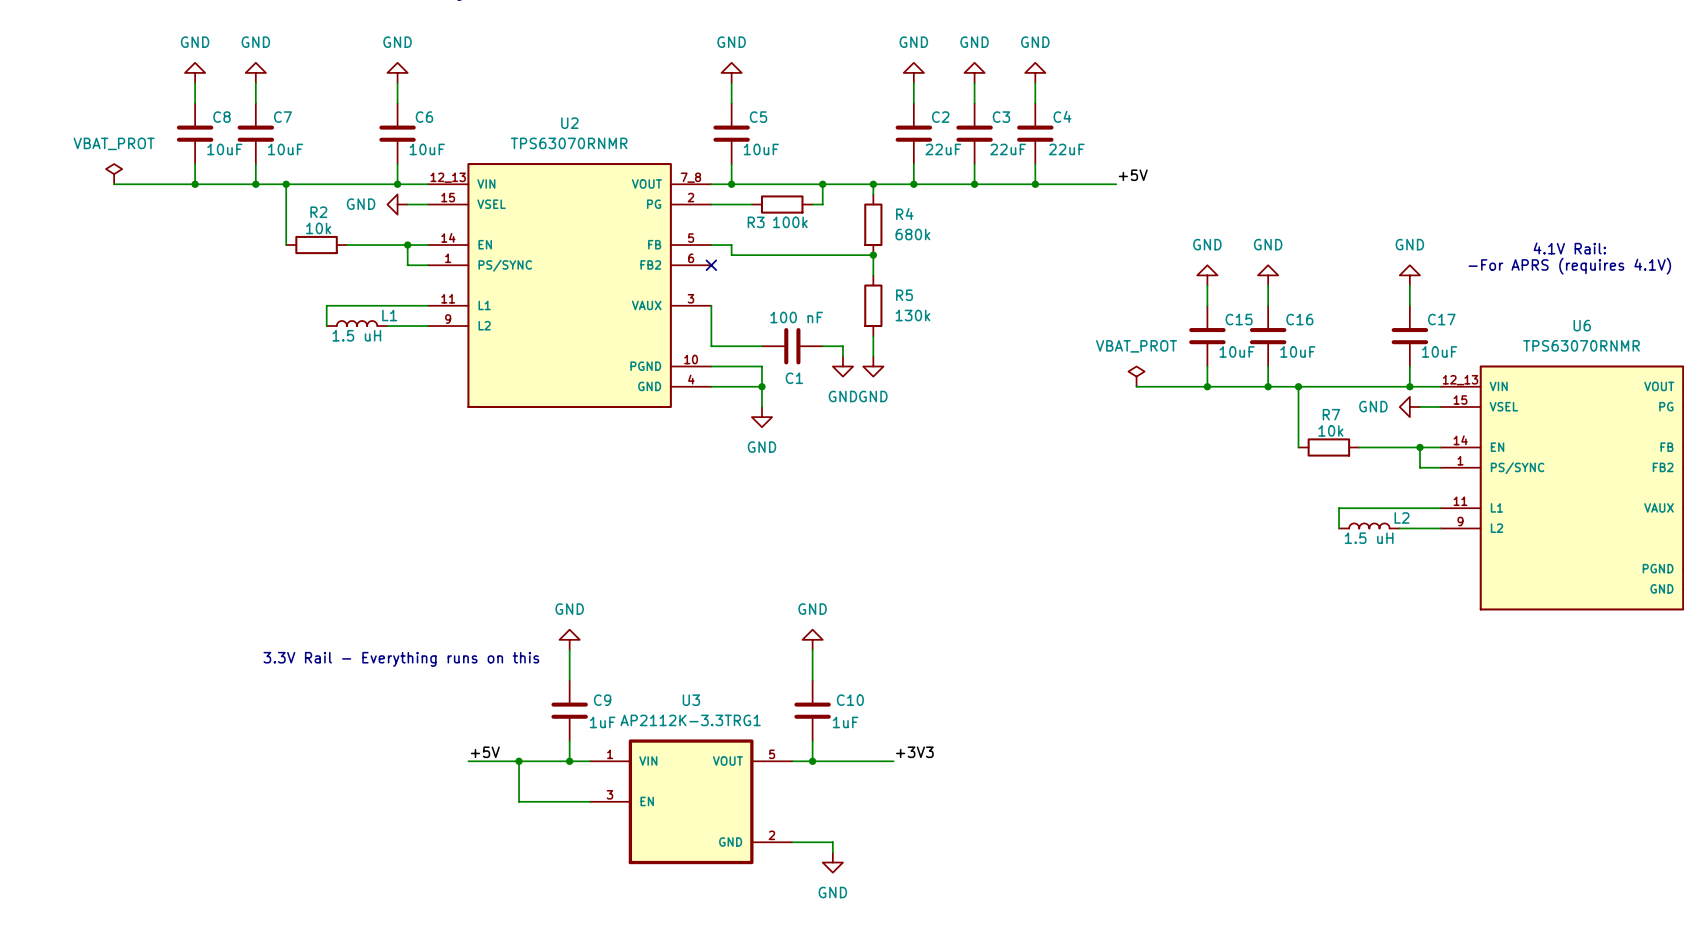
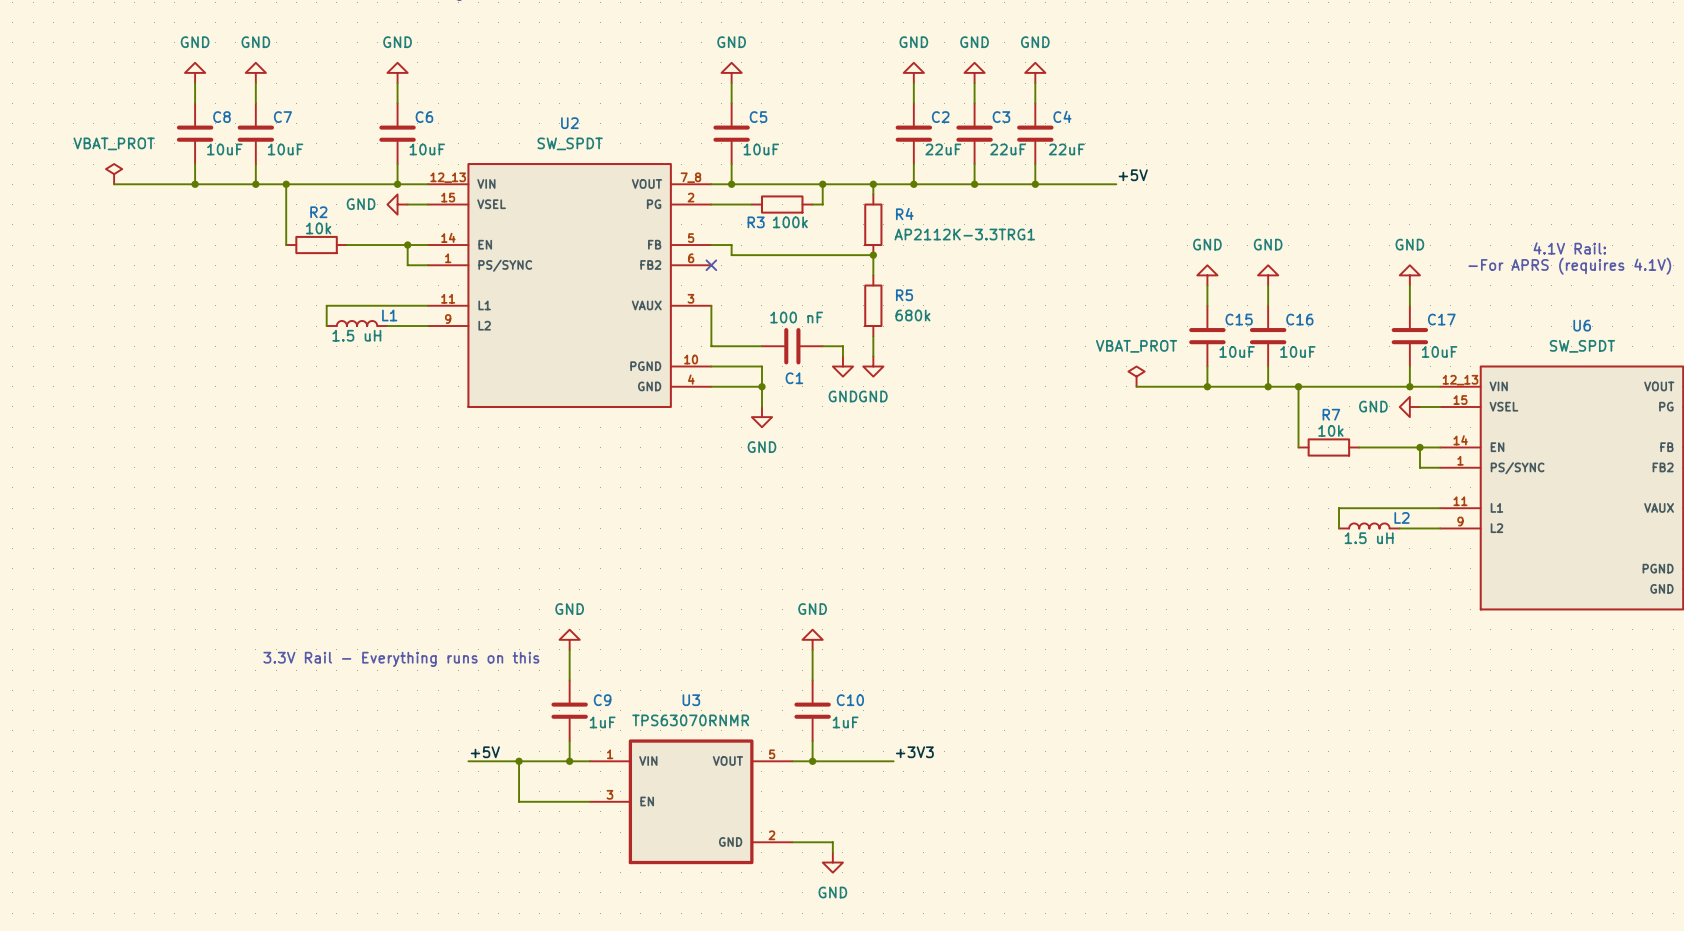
U2 value: TPS63070RNMR (569, 143) -> SW_SPDT (570, 143)
R4 value: 680k (912, 234) -> AP2112K-3.3TRG1 (964, 234)
R5 value: 130k (912, 315) -> 680k (912, 315)
U6 value: TPS63070RNMR (1581, 345) -> SW_SPDT (1582, 346)
U3 value: AP2112K-3.3TRG1 (690, 720) -> TPS63070RNMR (690, 720)

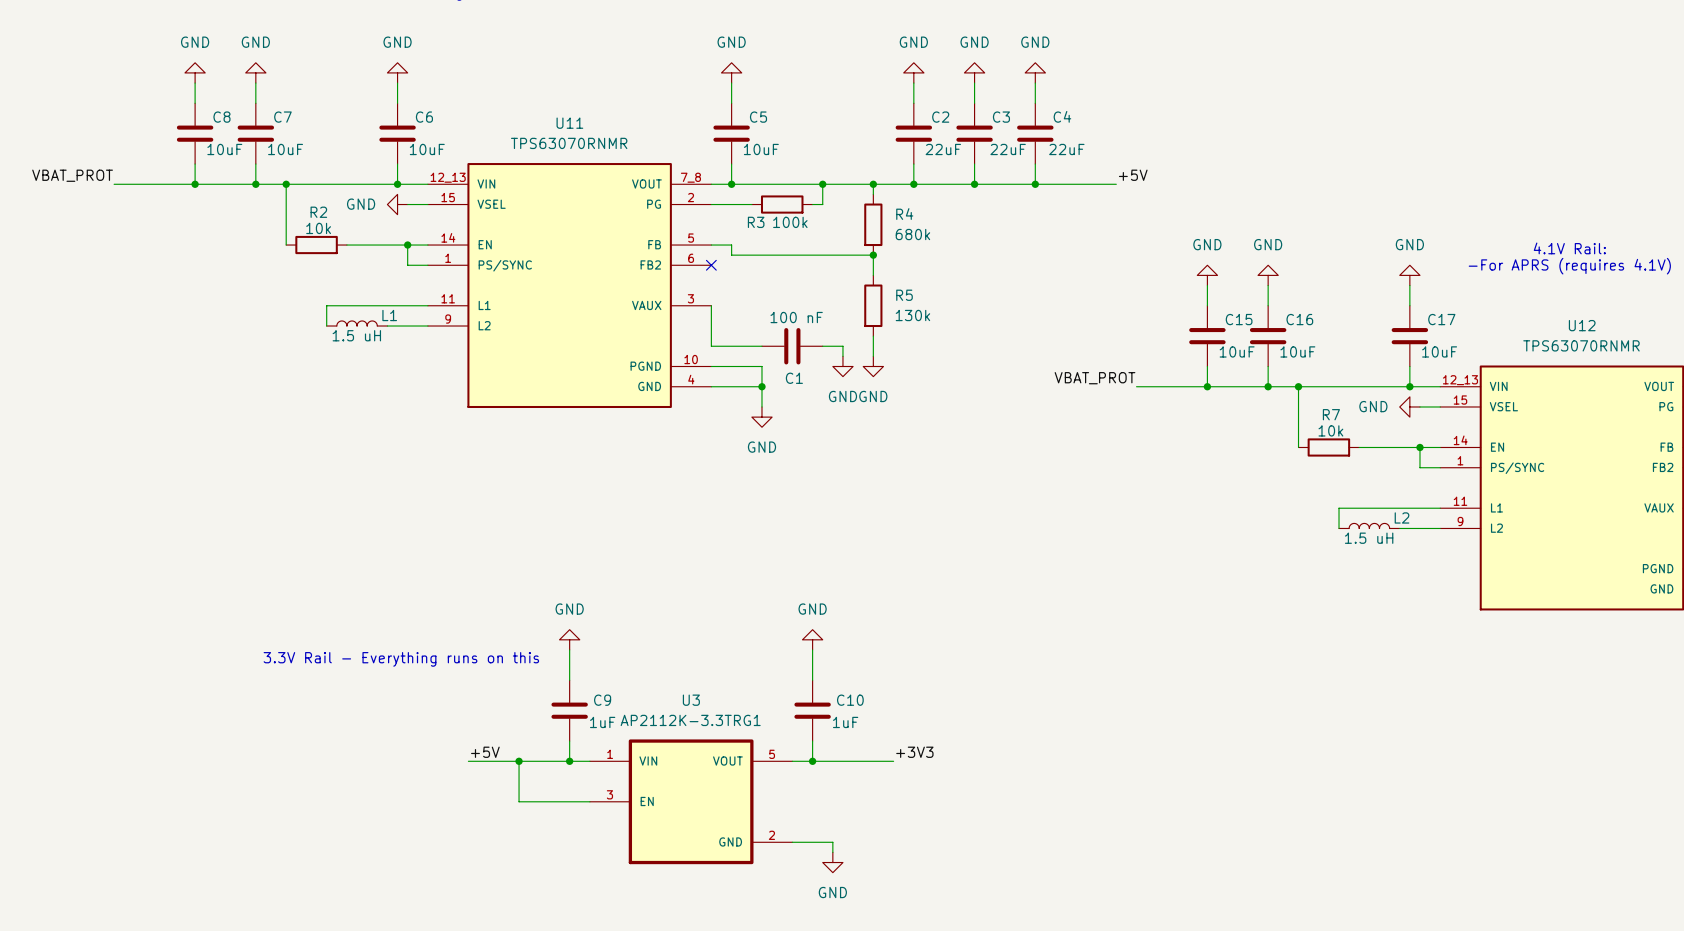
U2 name: U2 (569, 123) -> U11 (569, 123)
U2 value: SW_SPDT (570, 143) -> TPS63070RNMR (569, 143)
power symbol: VBAT_PROT (114, 174) -> none
label: none -> VBAT_PROT (72, 175)
R4 value: AP2112K-3.3TRG1 (964, 234) -> 680k (912, 234)
R5 value: 680k (912, 315) -> 130k (912, 315)
U6 name: U6 (1582, 325) -> U12 (1582, 325)
U6 value: SW_SPDT (1582, 346) -> TPS63070RNMR (1581, 345)
power symbol: VBAT_PROT (1136, 376) -> none
label: none -> VBAT_PROT (1095, 378)
U3 value: TPS63070RNMR (690, 720) -> AP2112K-3.3TRG1 (690, 720)

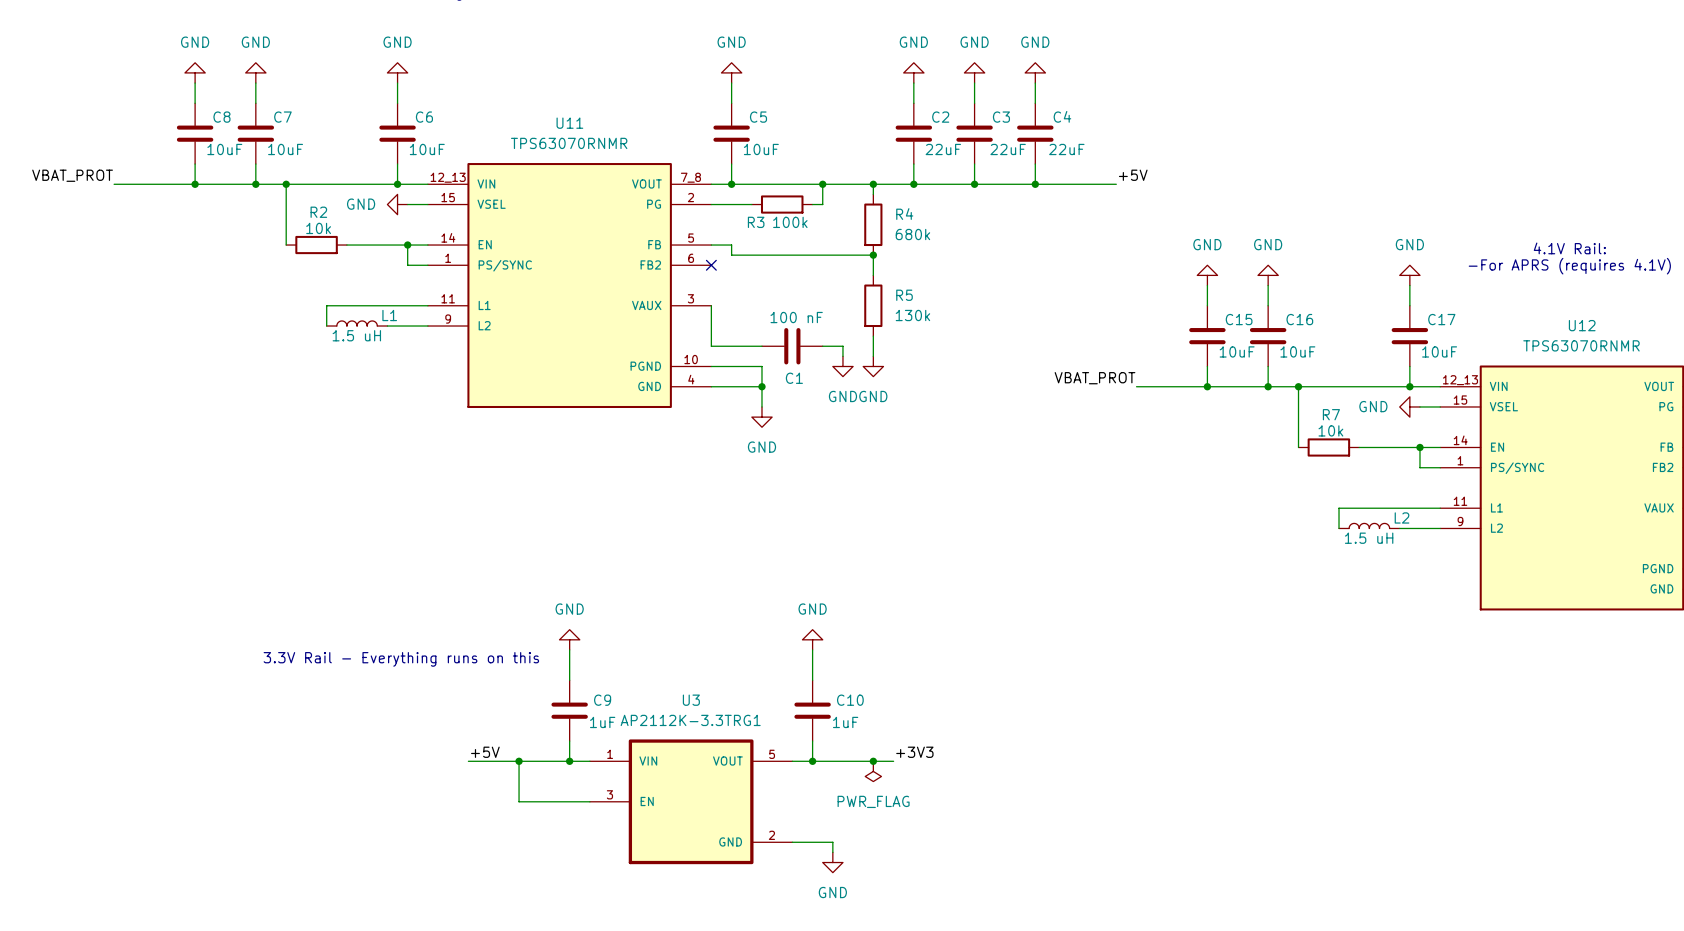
junction: none -> (873, 761)
power symbol: none -> PWR_FLAG (873, 771)

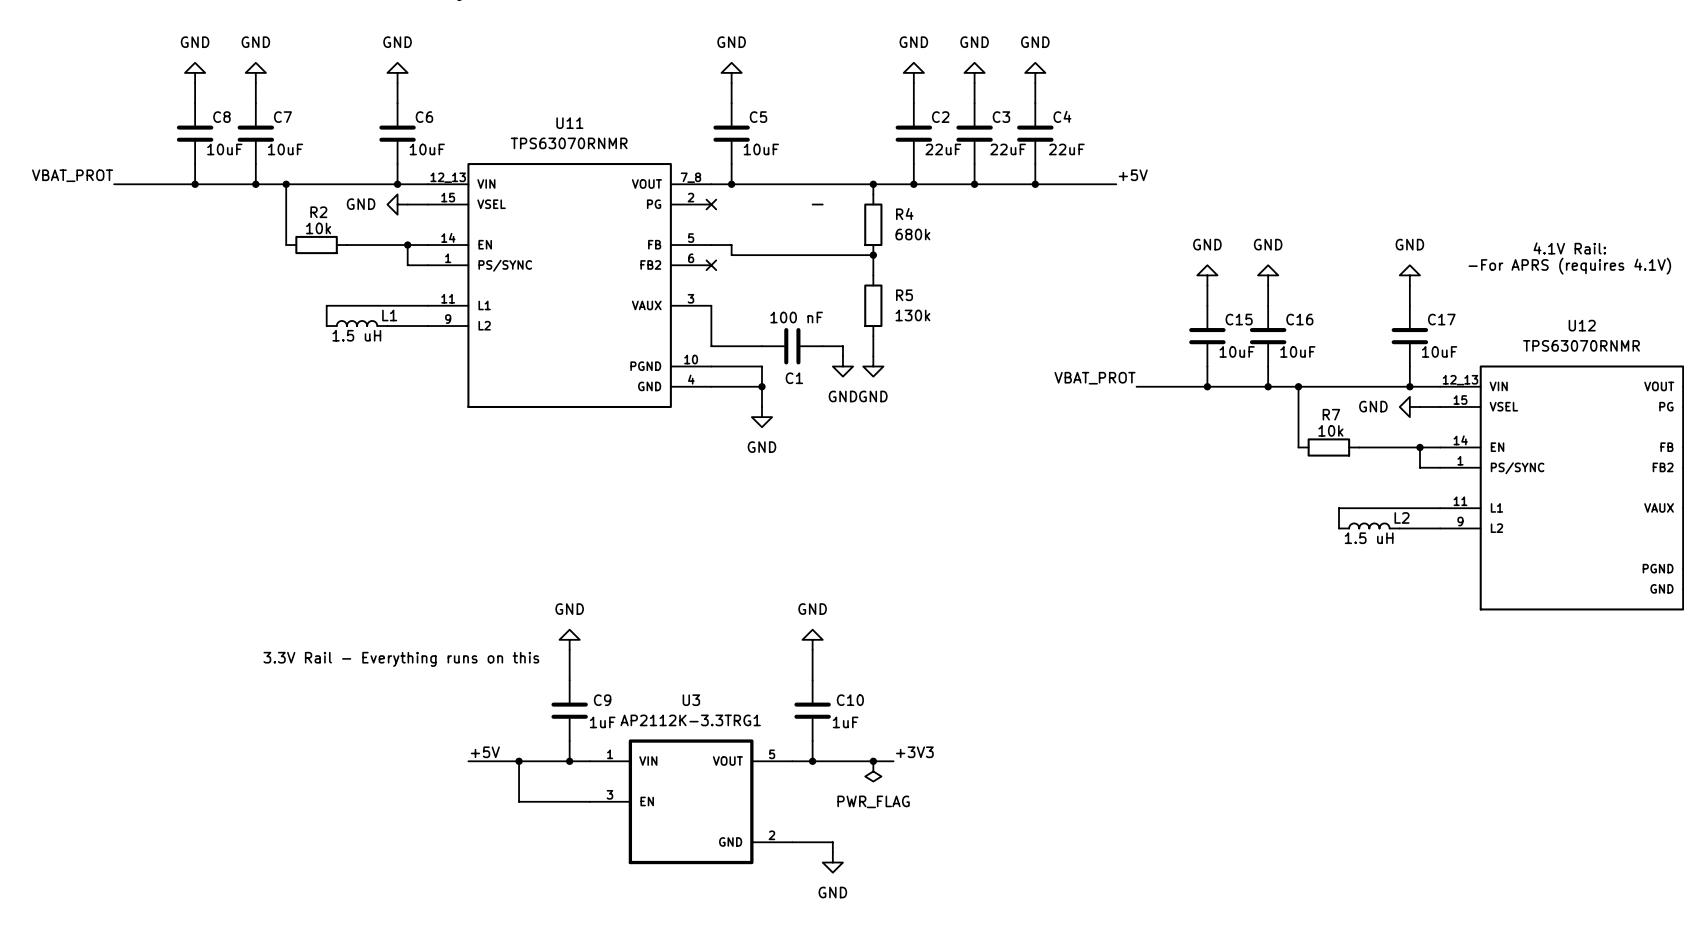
wire: (822, 184) (822, 204) -> none
junction: (822, 184) -> none
wire: (711, 204) (751, 204) -> none
no-connect mark: none -> (711, 204)
R3: 100k (782, 204) -> none

